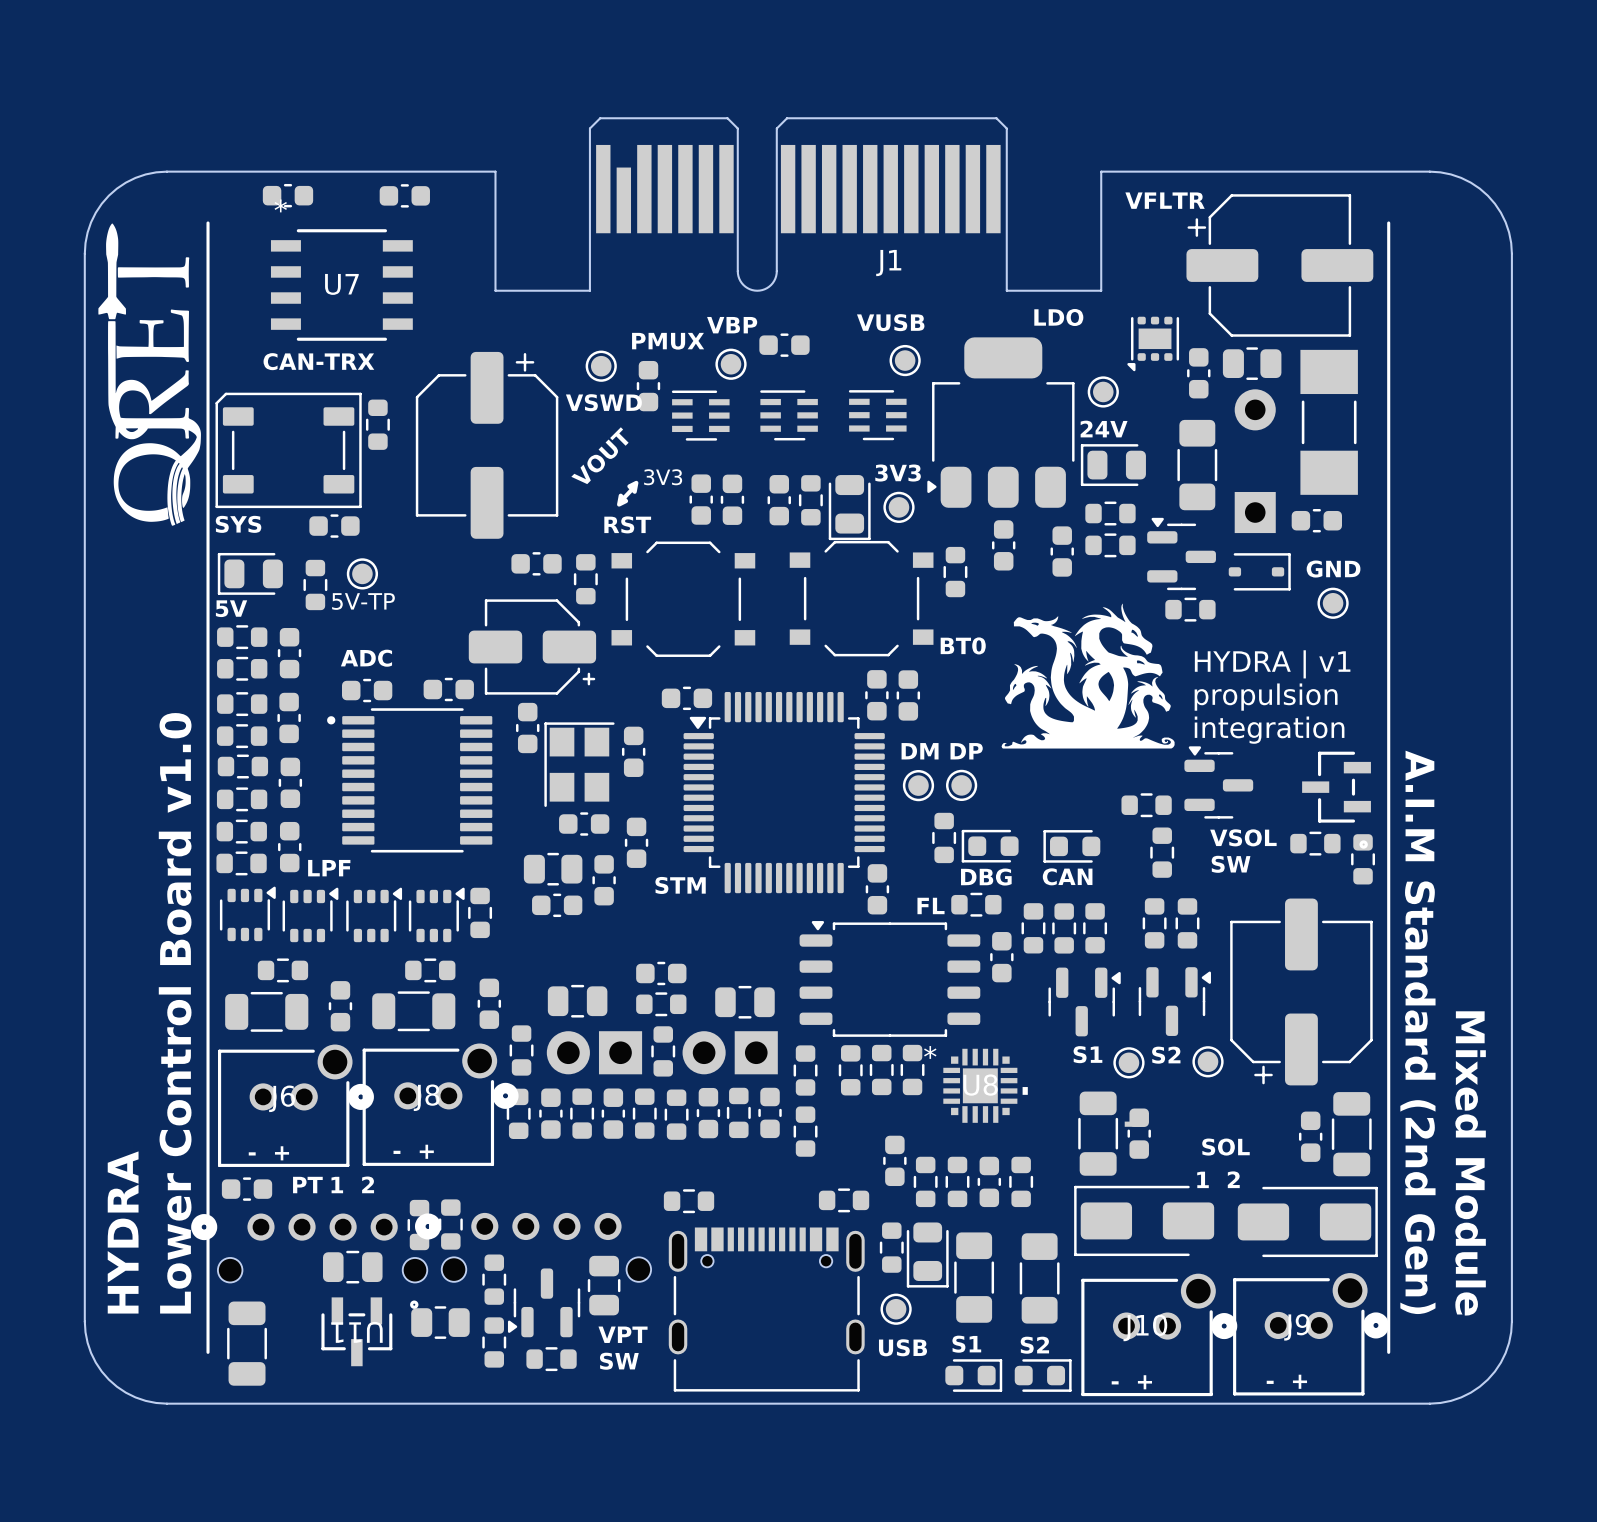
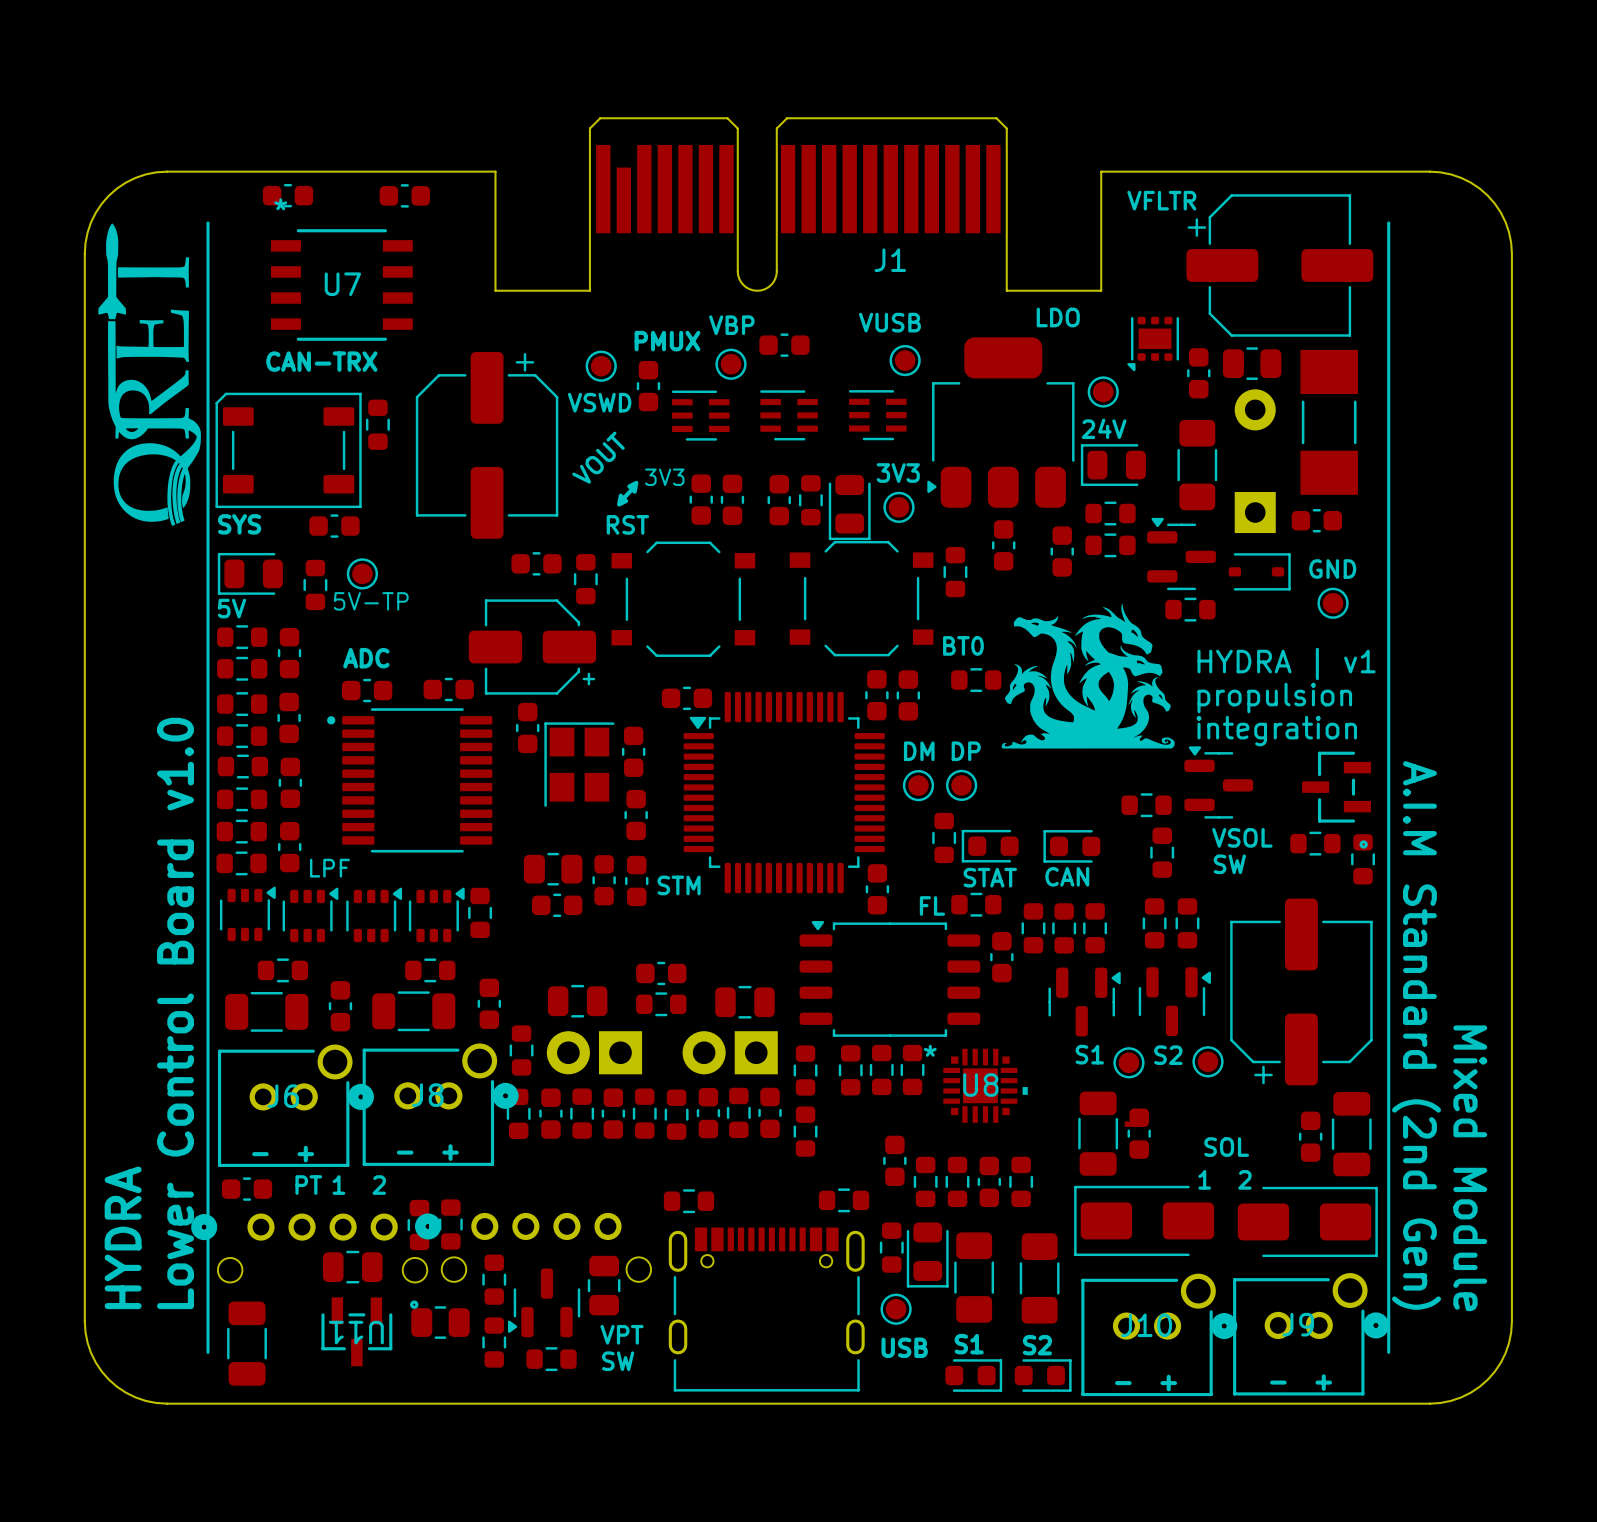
part: none -> (636, 815)
part: (584, 824) -> none
part: (636, 842) -> none
text: DBG (986, 877) -> STAT (990, 877)
part: none -> (636, 880)
part rotation: 0° (663, 1051) -> 90° clockwise (976, 680)
part position: (663, 1051) -> (976, 680)

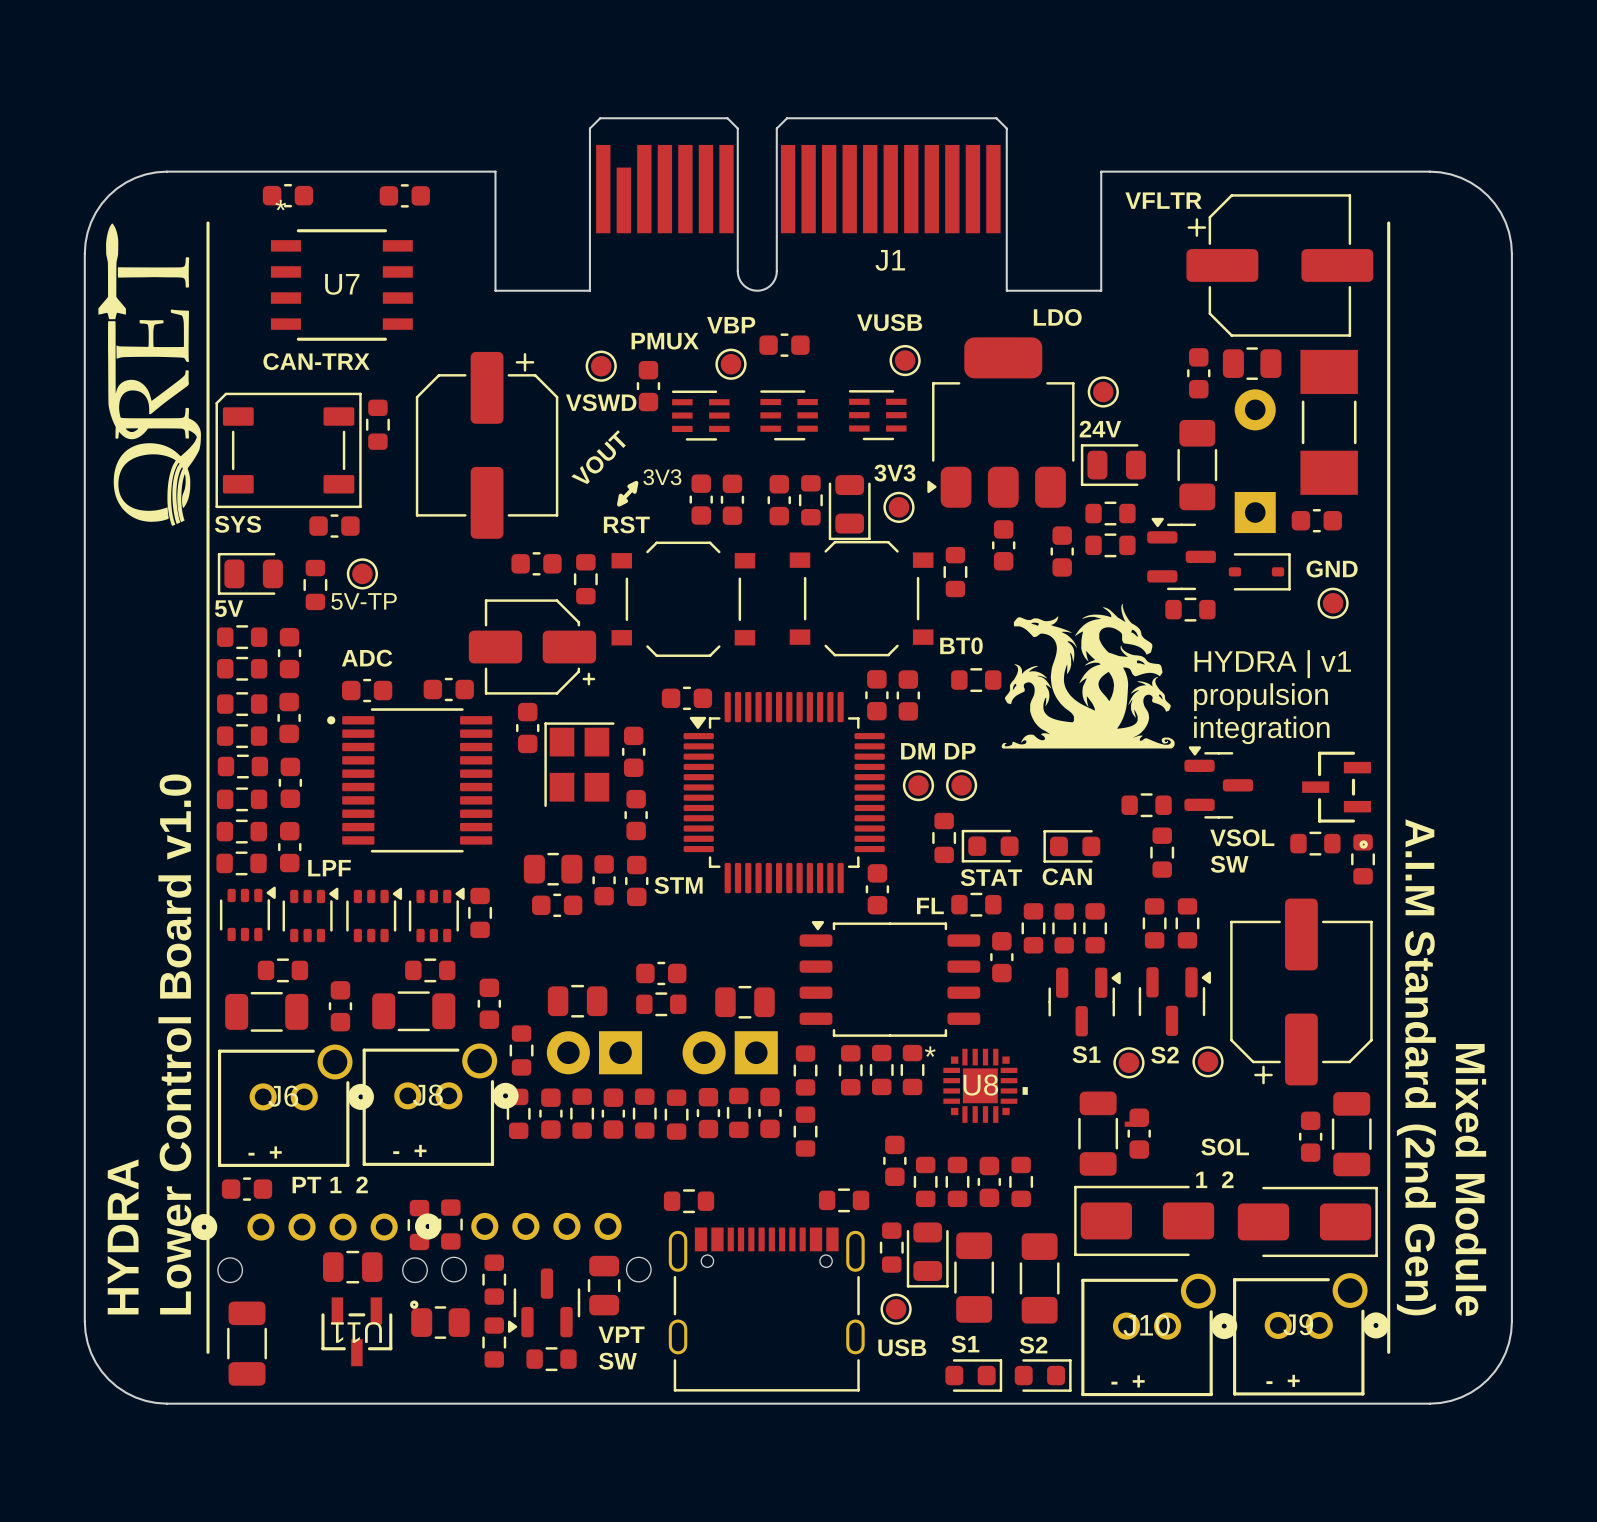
part: (1153, 343) -> none

